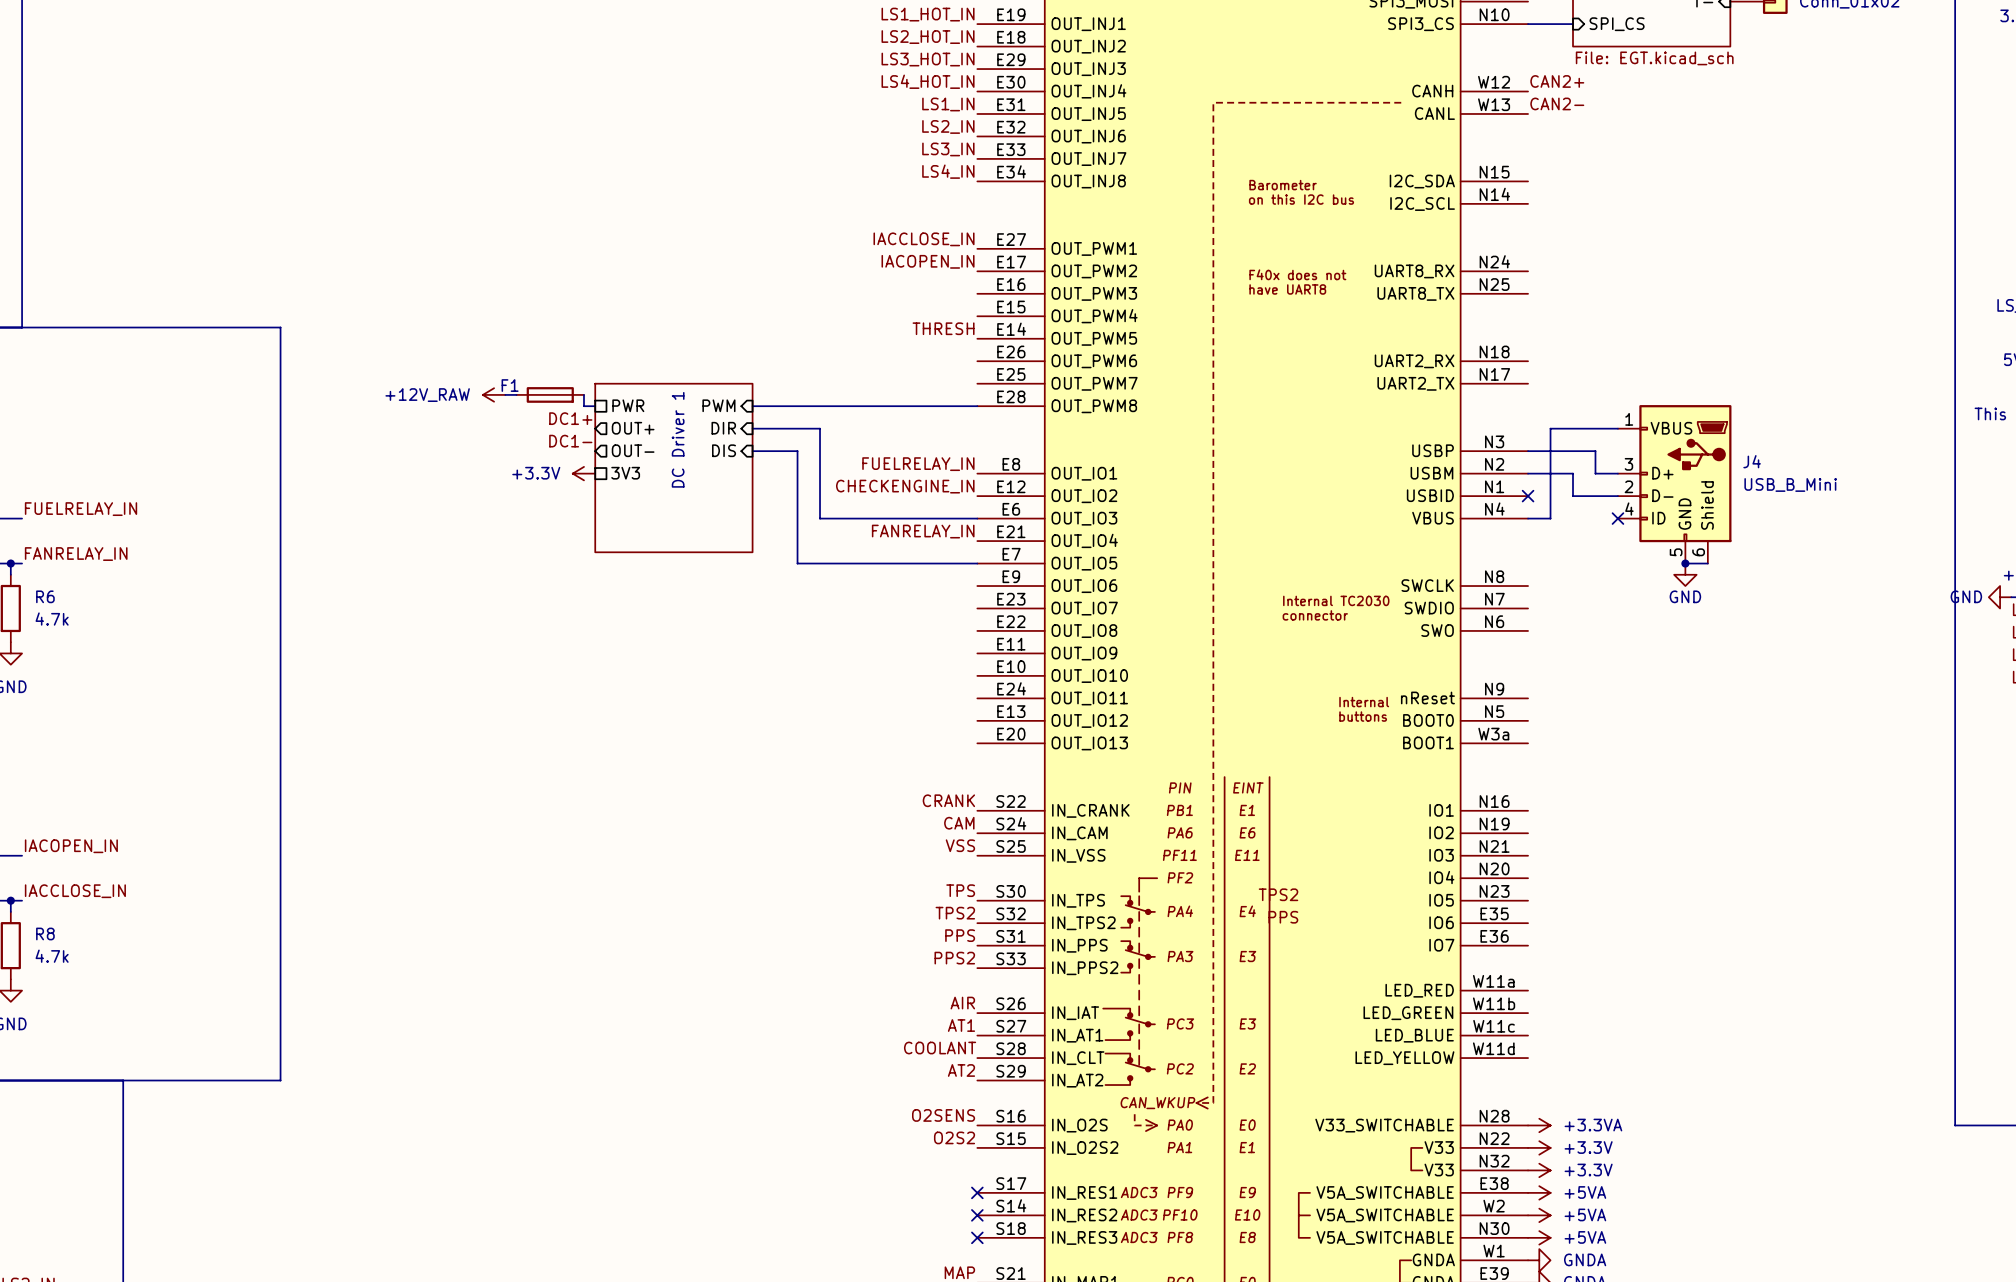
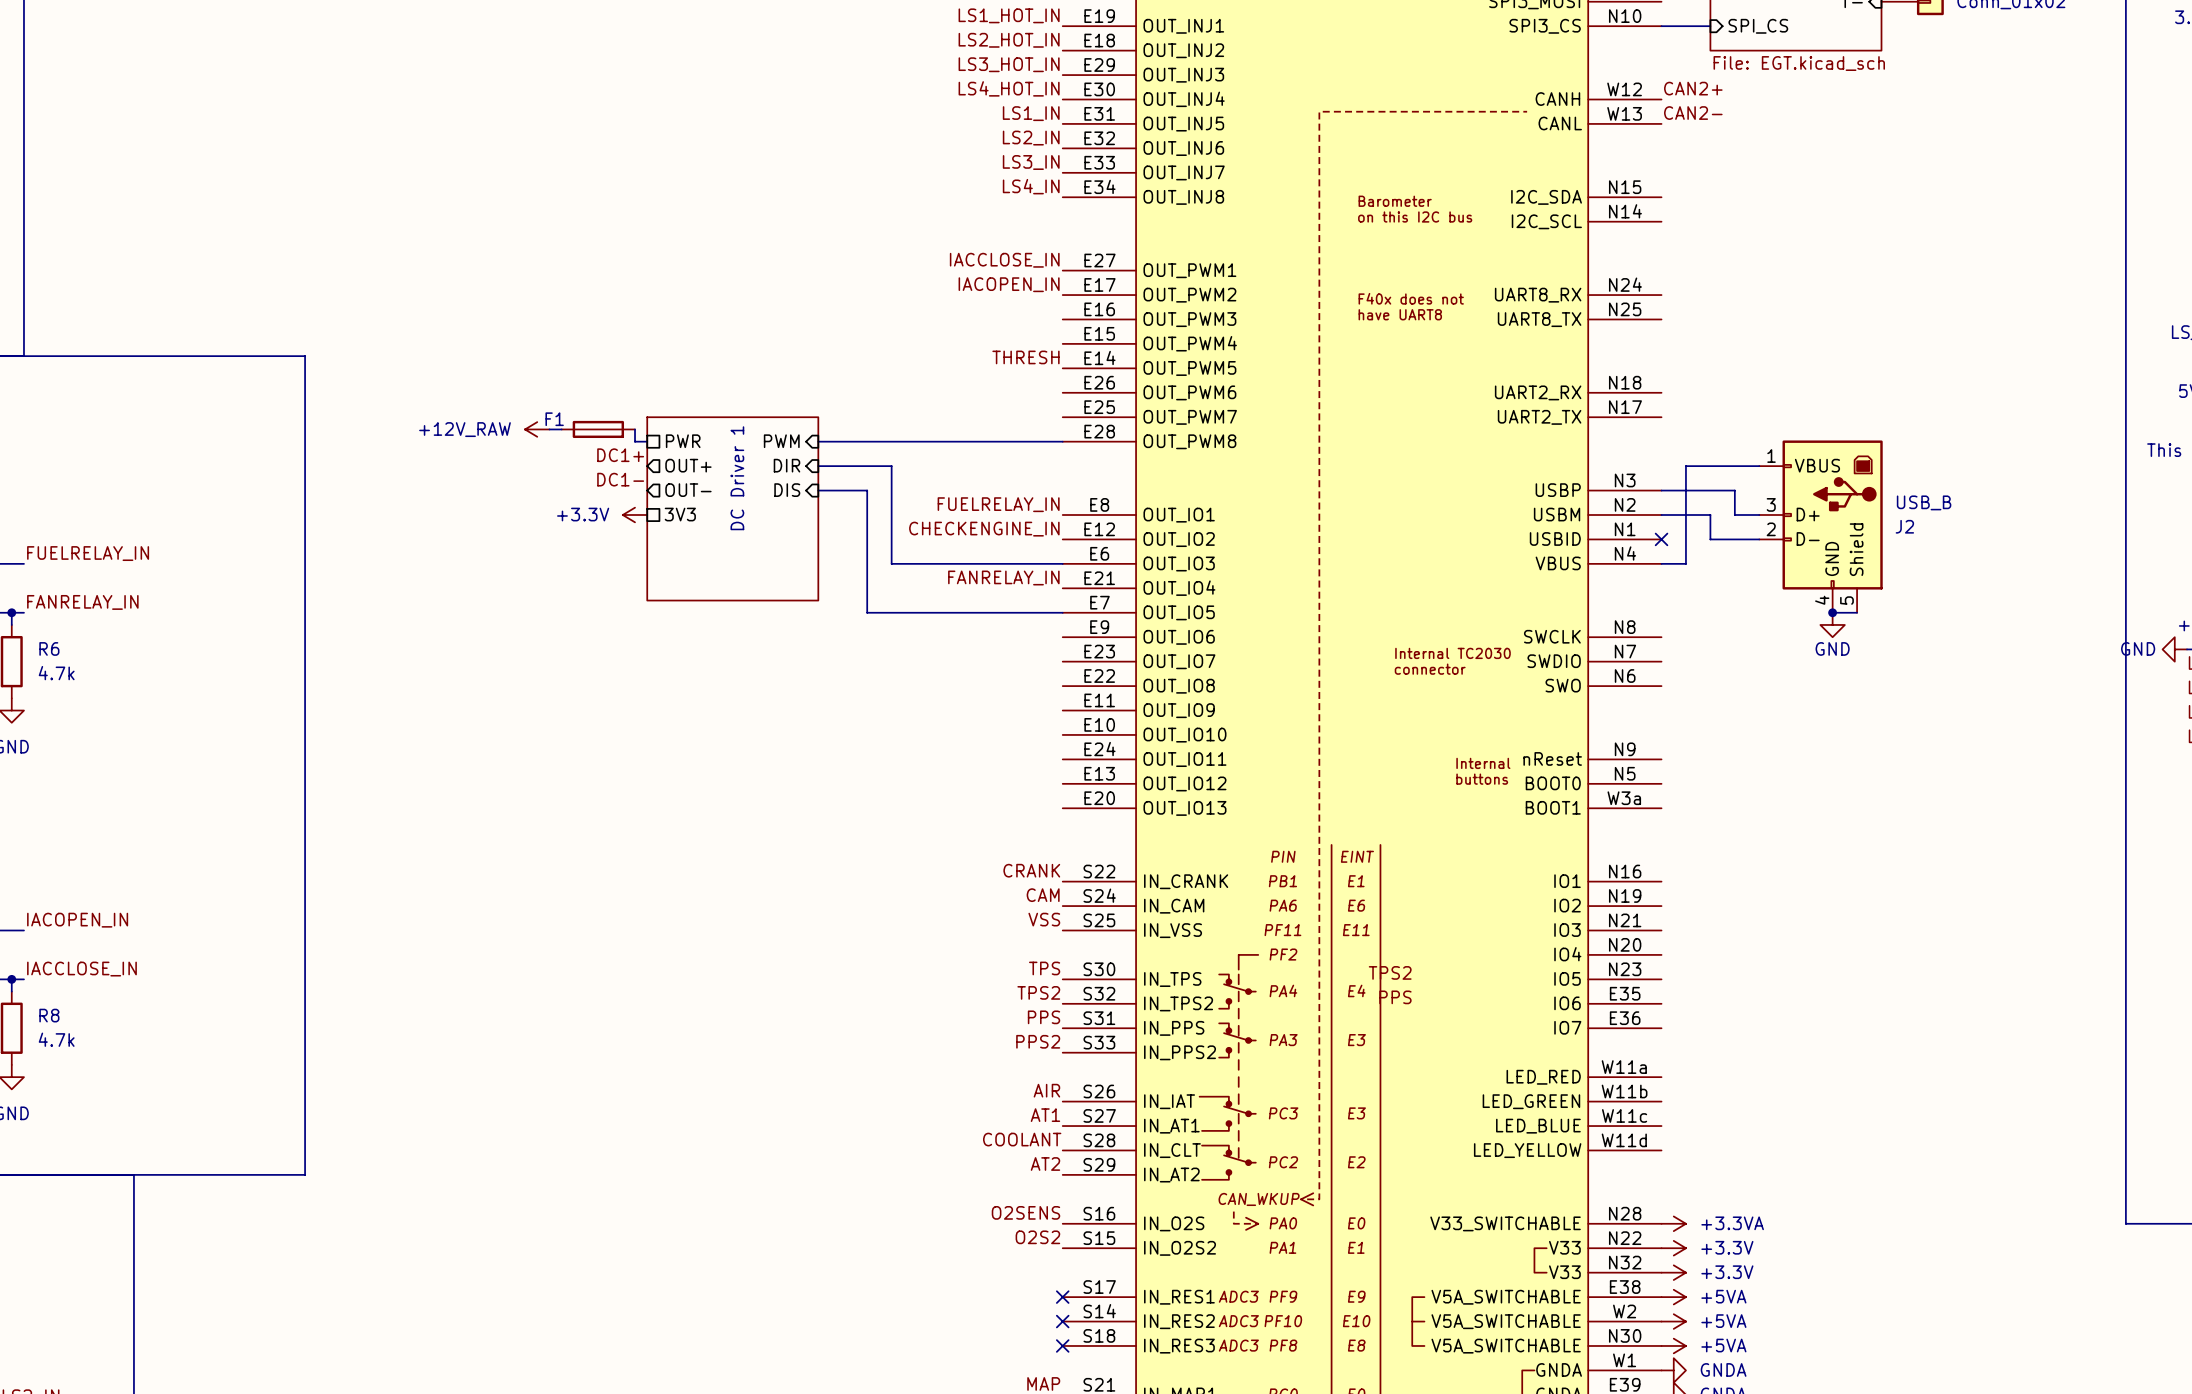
J4: USB_B_Mini (1674, 484) -> none
J2: none -> USB_B (1821, 526)
no-connect mark: (1617, 518) -> none

